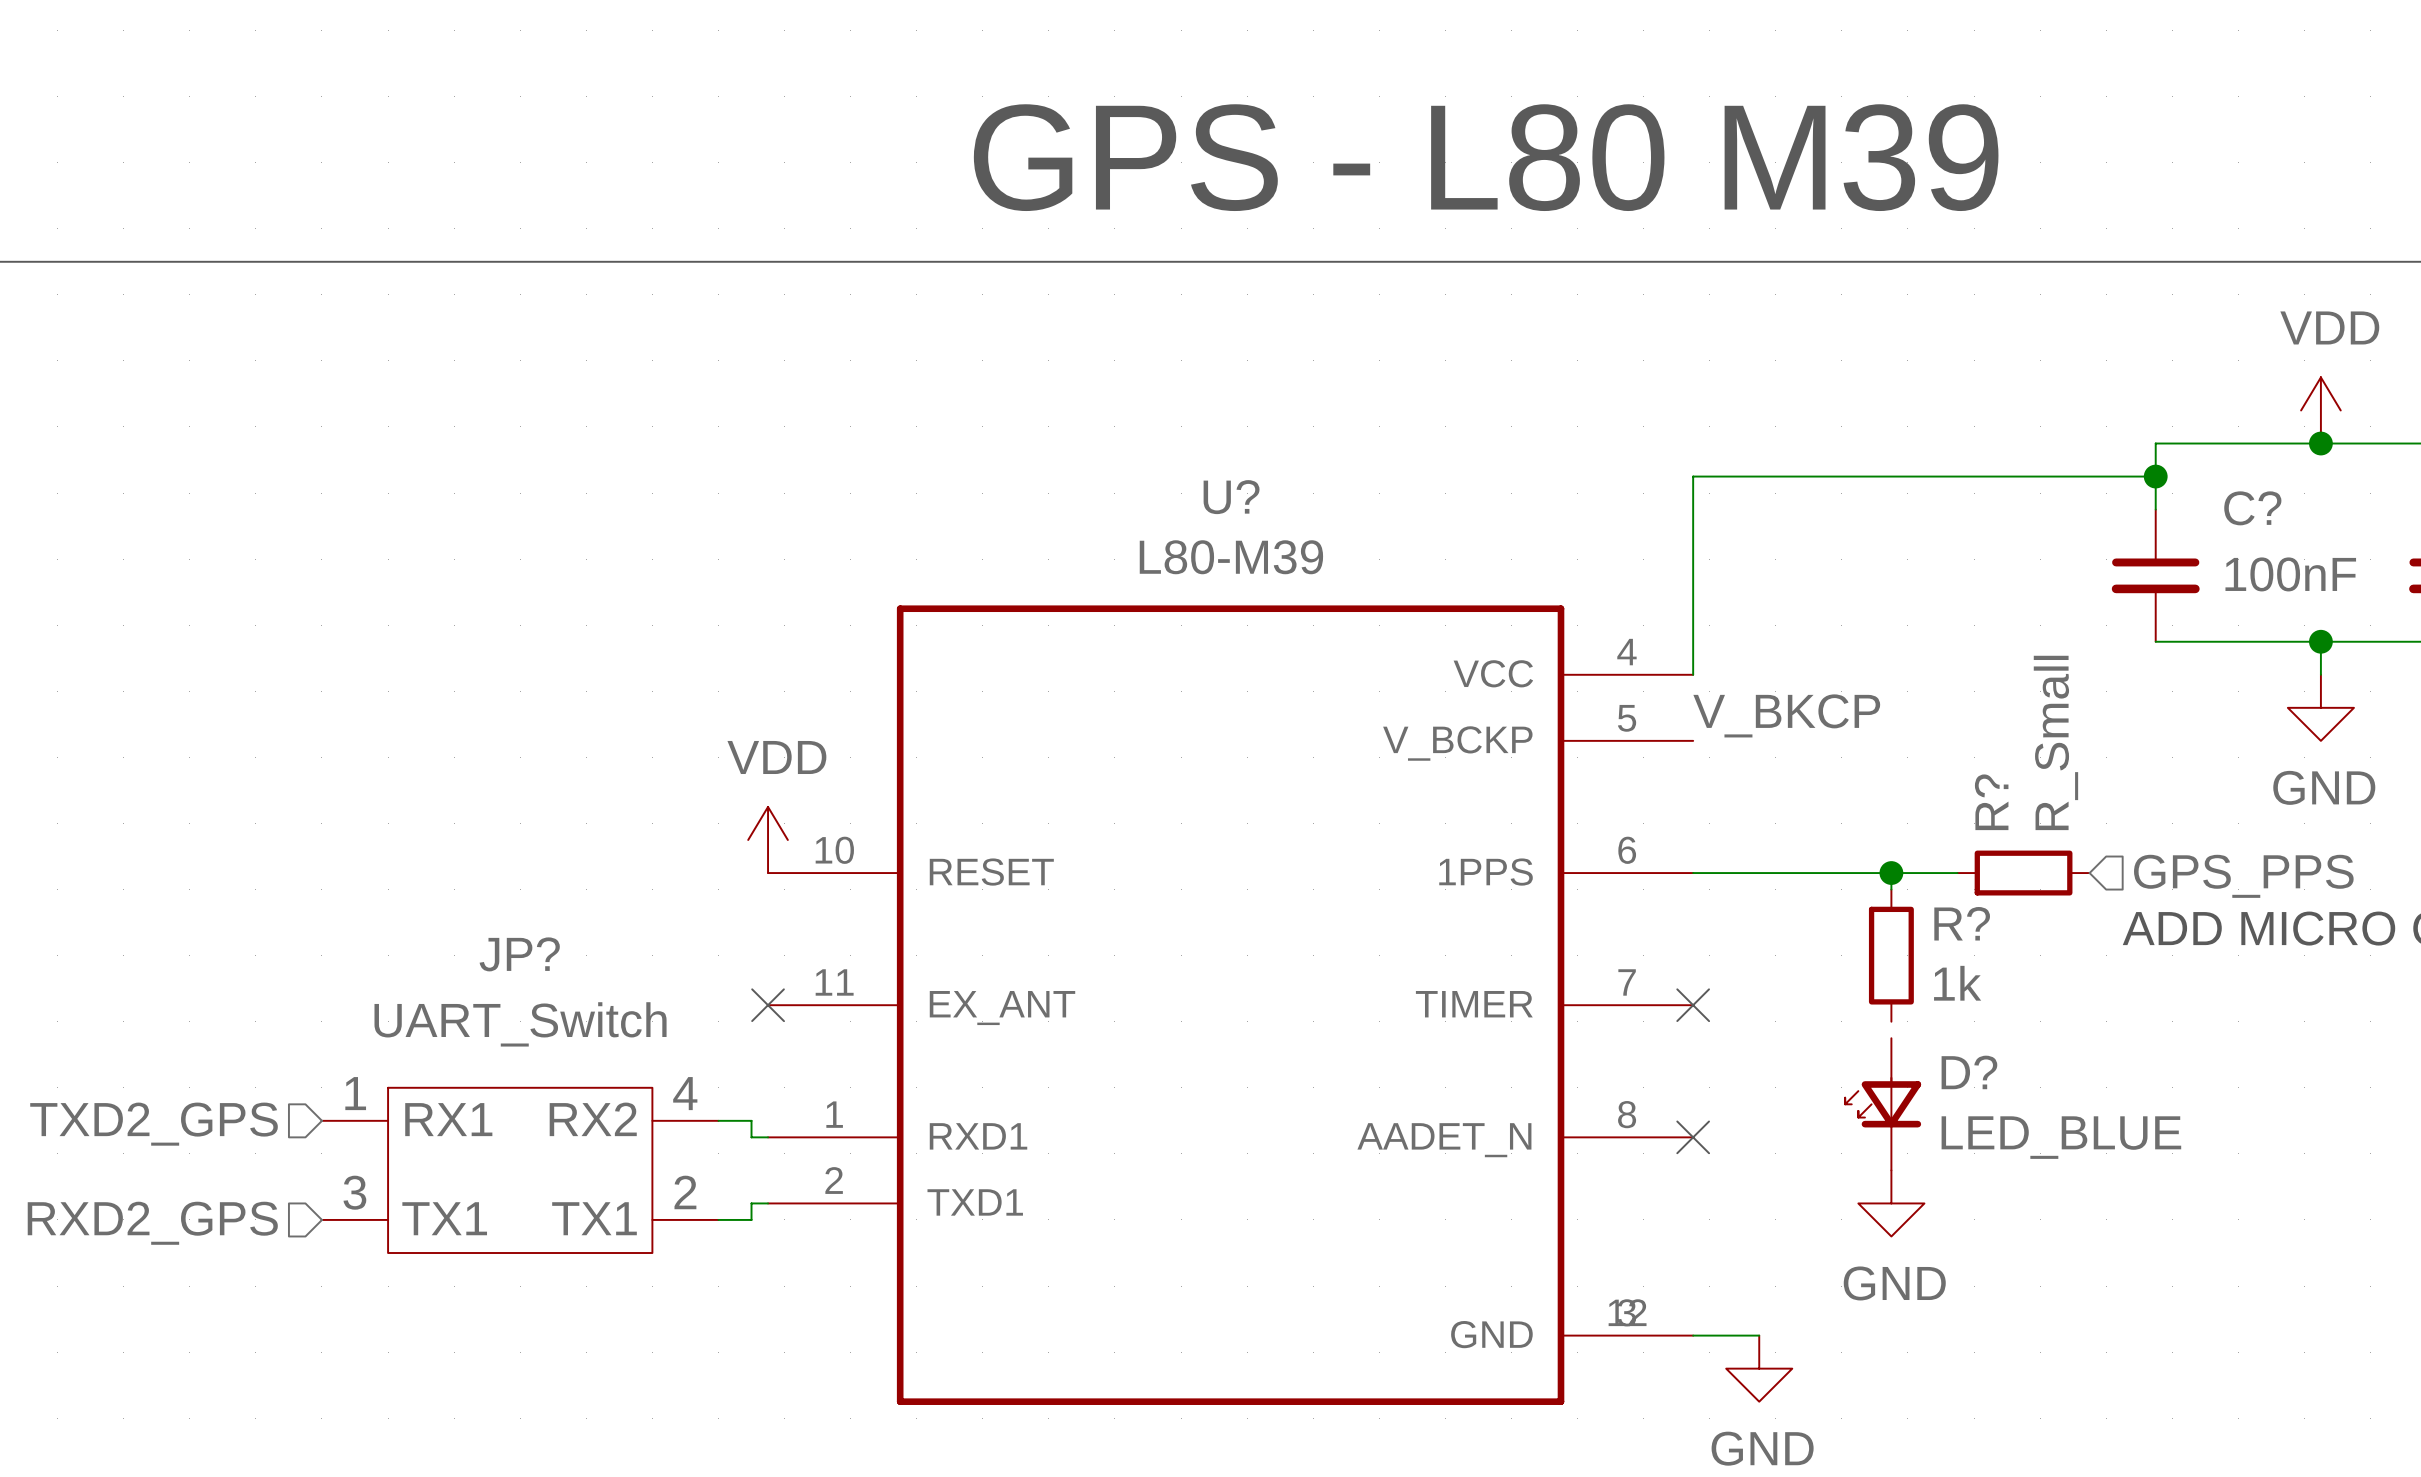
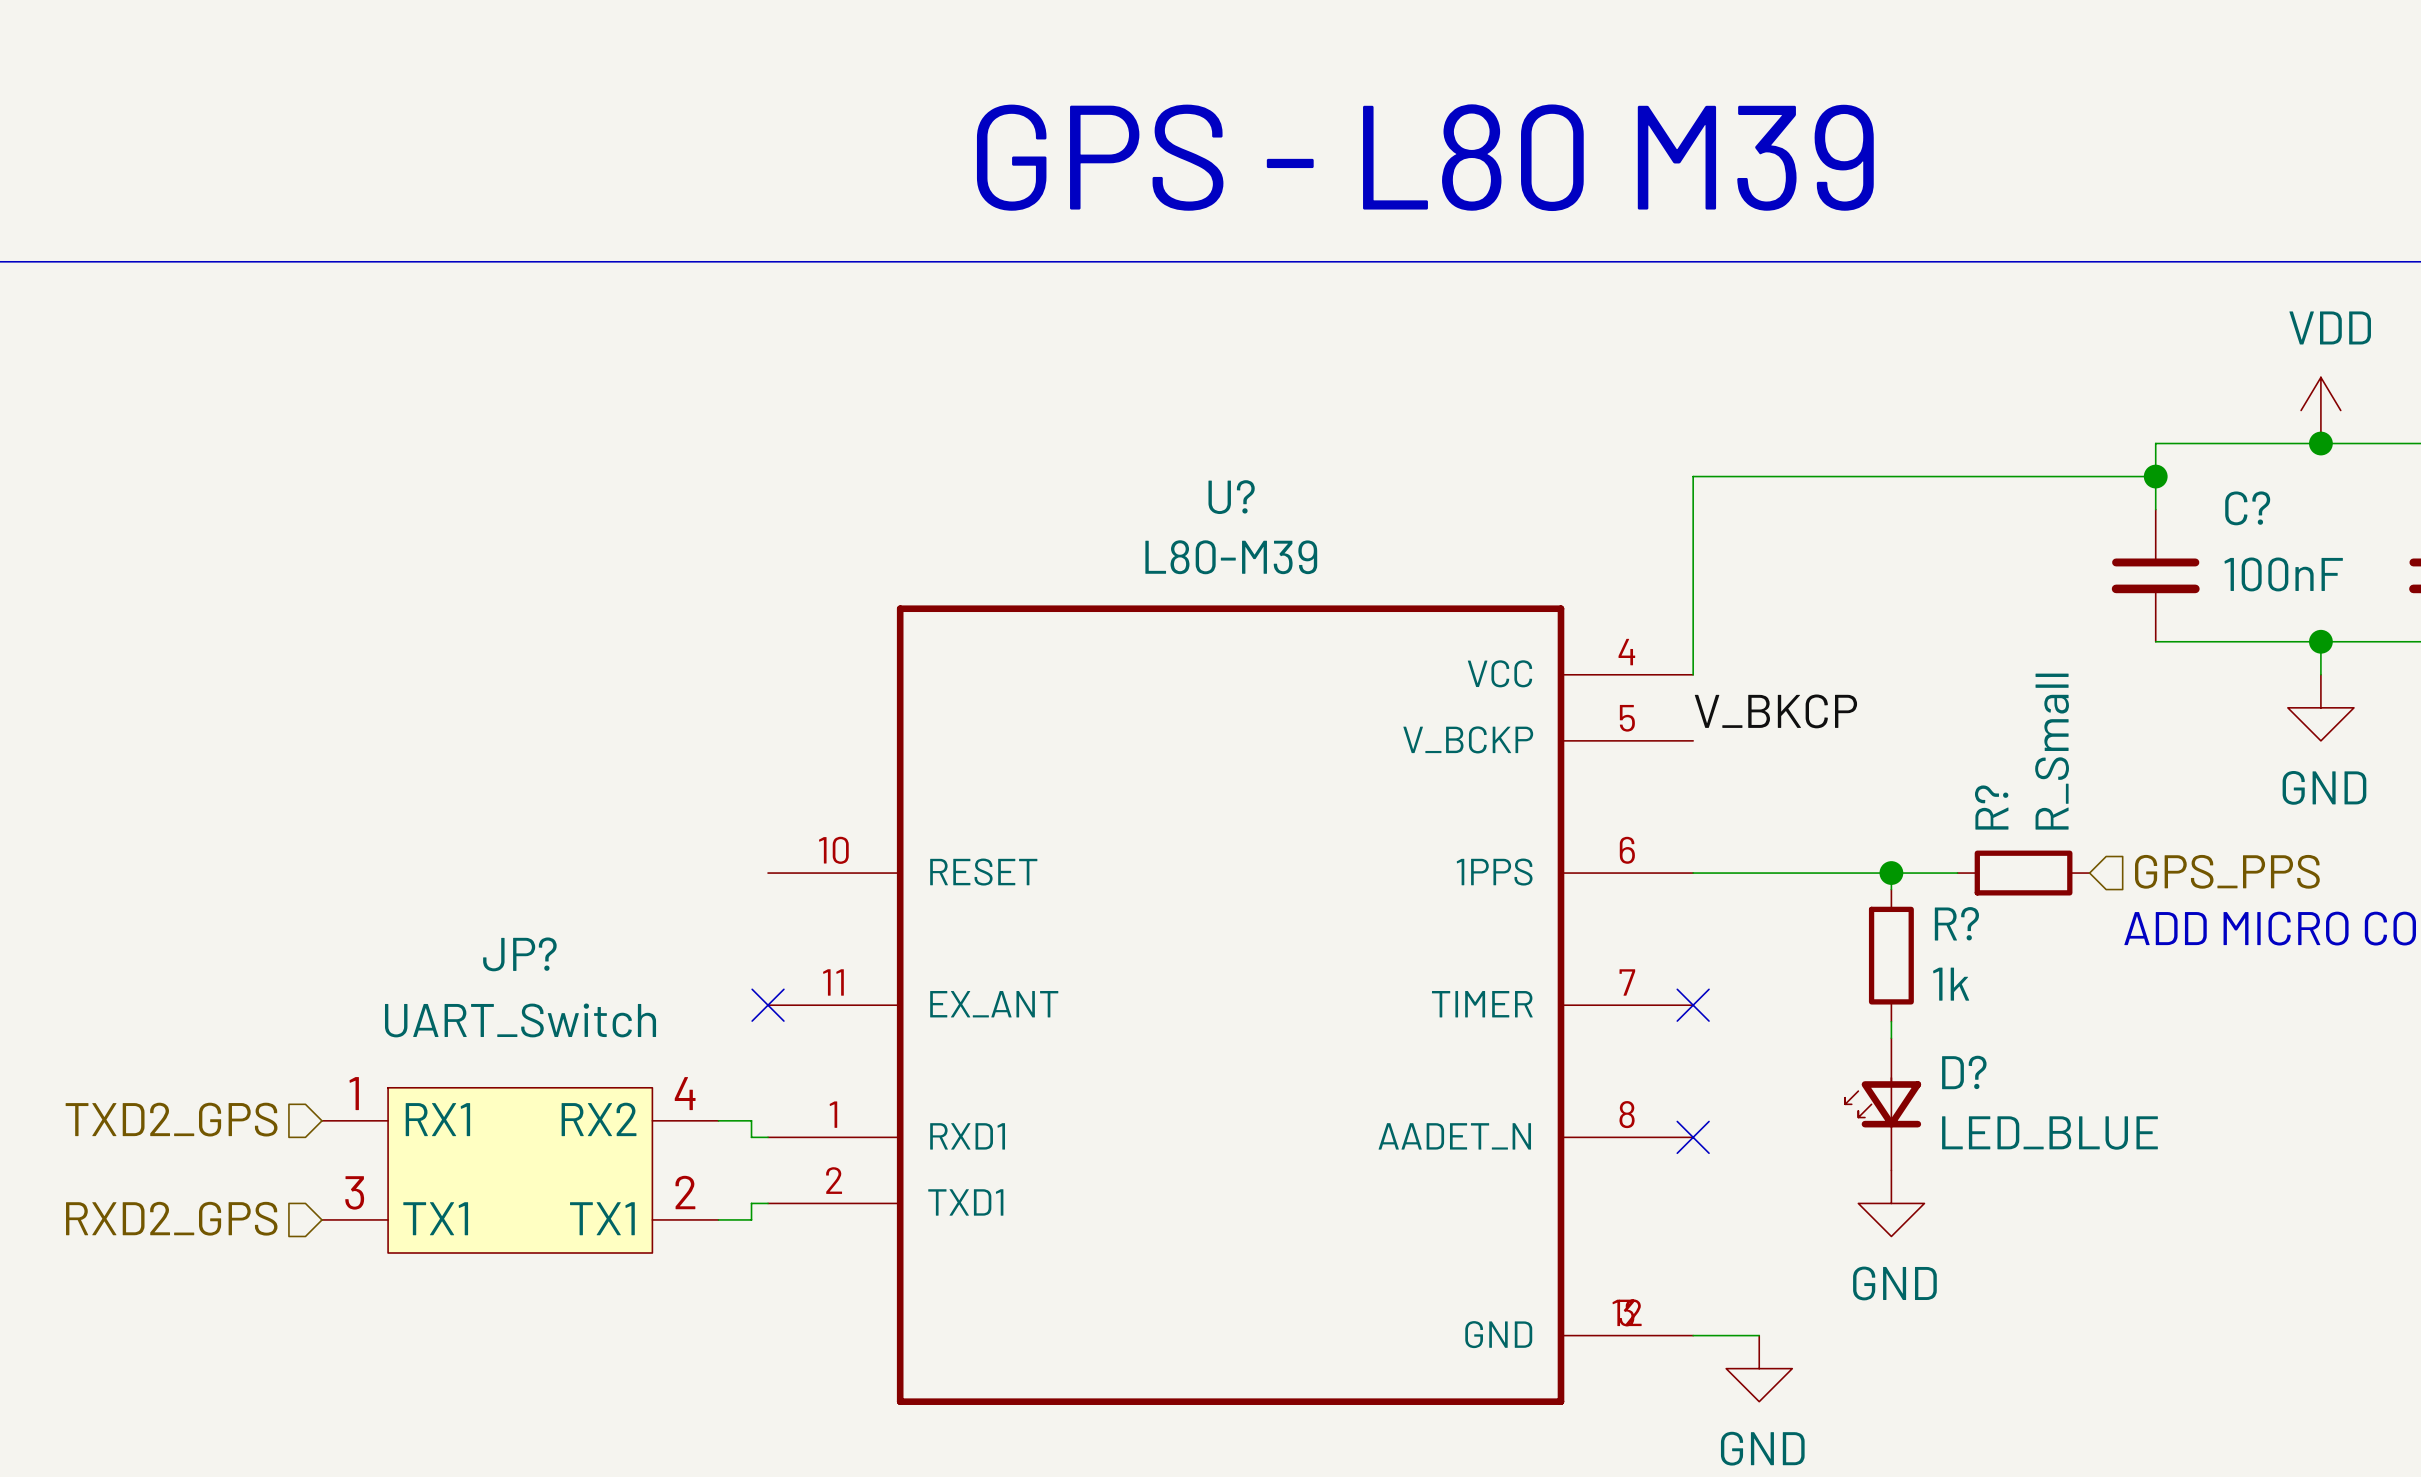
power symbol: VDD (768, 839) -> none
wire: none -> (1891, 1021) (1891, 1038)

